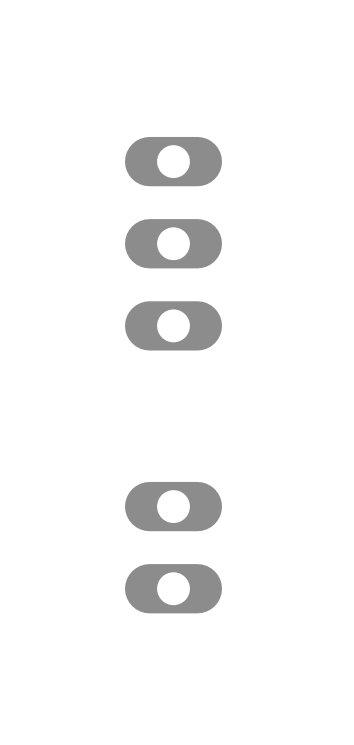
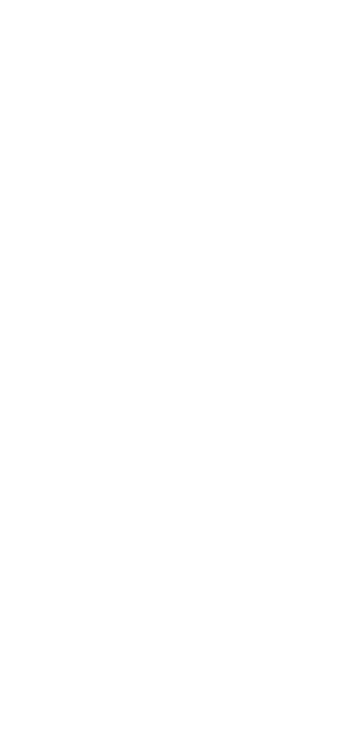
part: (173, 243) -> none
part: (173, 547) -> none

